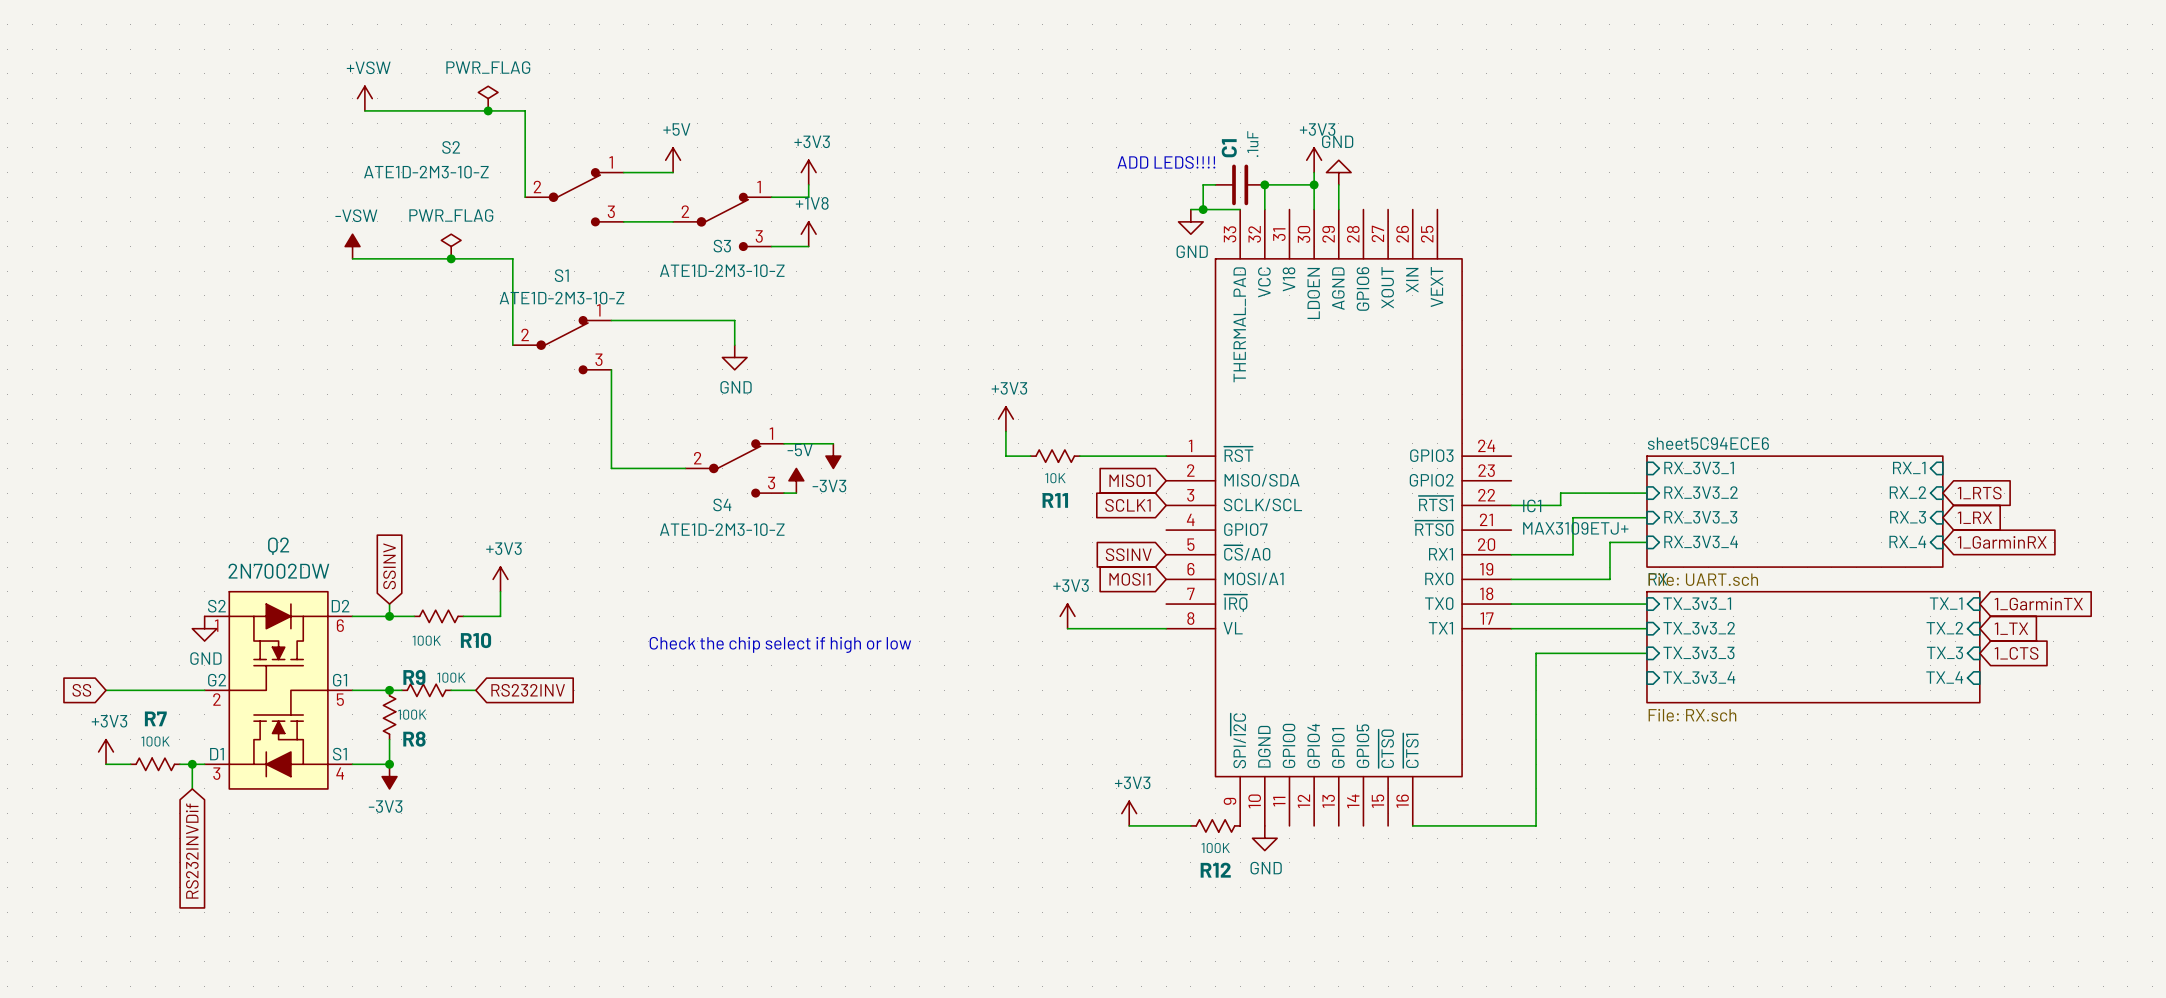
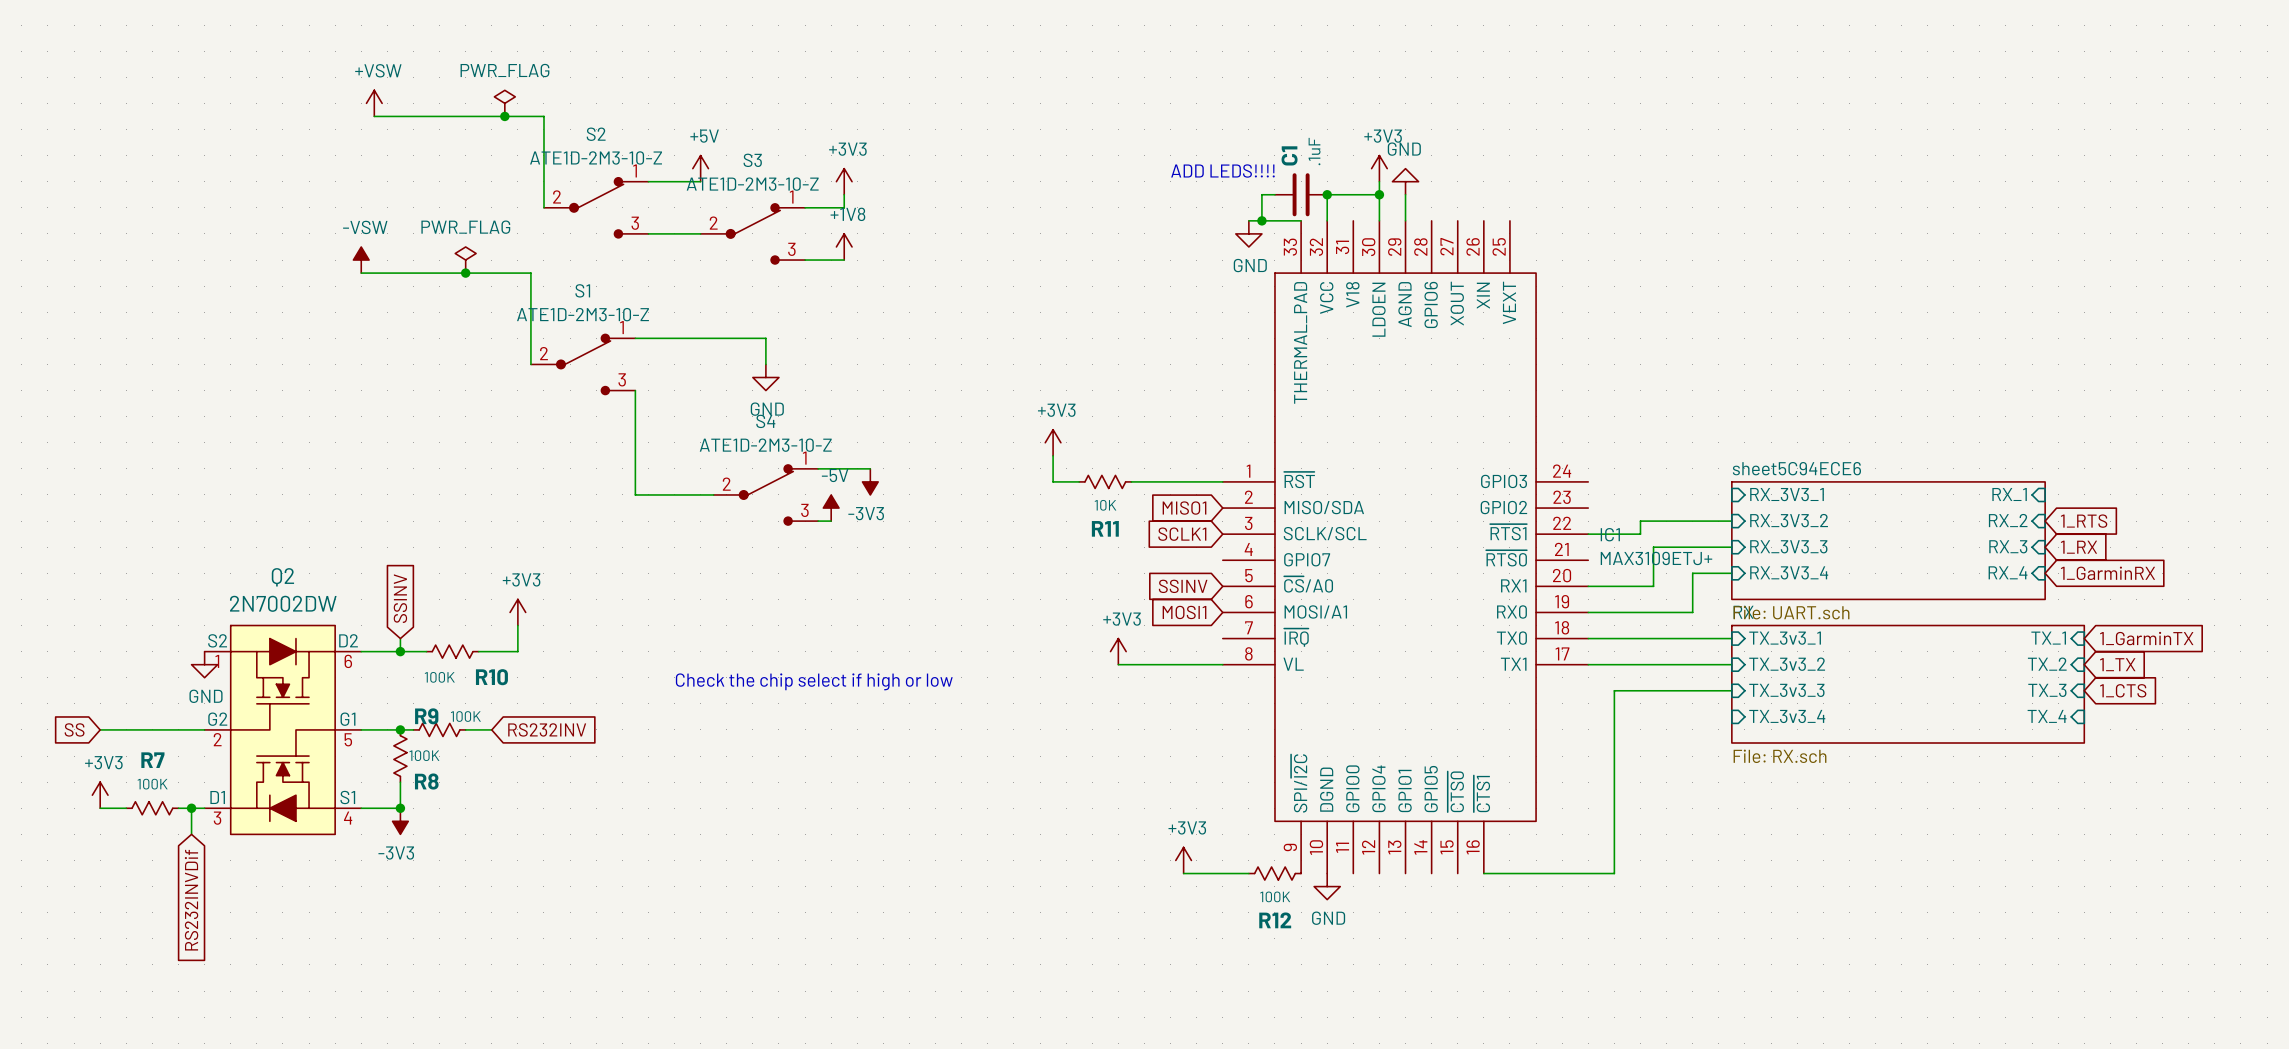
S2 name position: S2 (451, 147) -> S2 (596, 134)
S2 value position: ATE1D-2M3-10-Z (426, 172) -> ATE1D-2M3-10-Z (596, 157)
S3 name position: S3 (722, 246) -> S3 (752, 160)
S3 value position: ATE1D-2M3-10-Z (722, 270) -> ATE1D-2M3-10-Z (752, 184)
S4 name position: S4 (722, 504) -> S4 (765, 421)
S4 value position: ATE1D-2M3-10-Z (722, 529) -> ATE1D-2M3-10-Z (765, 445)

